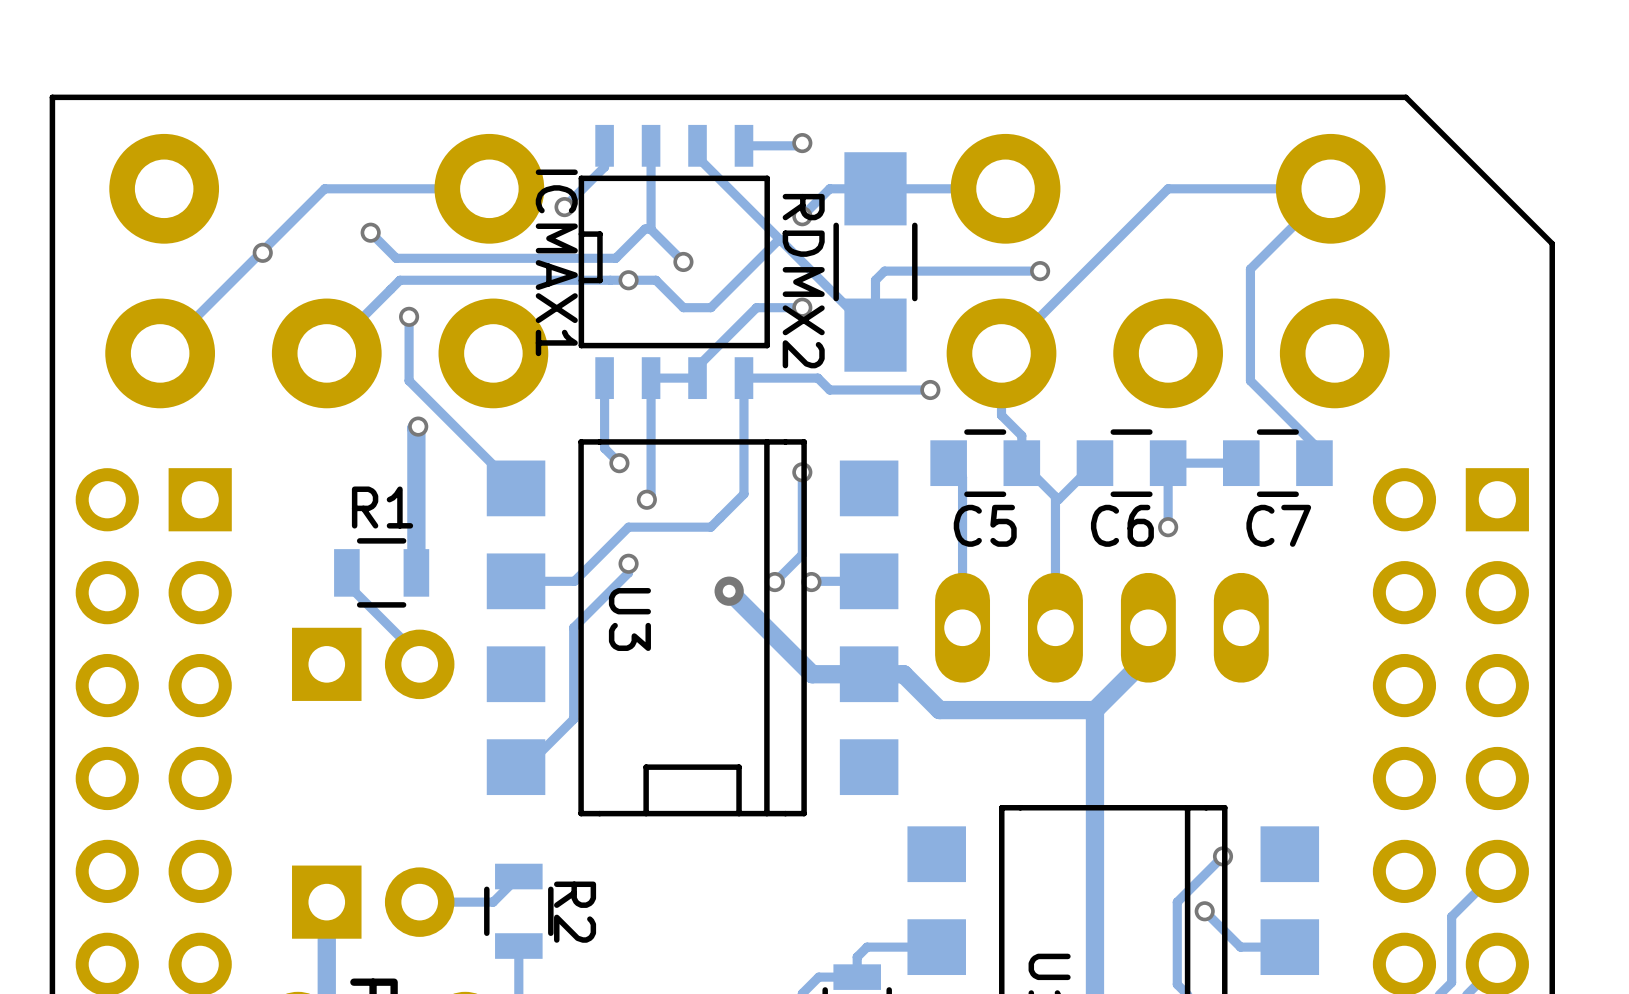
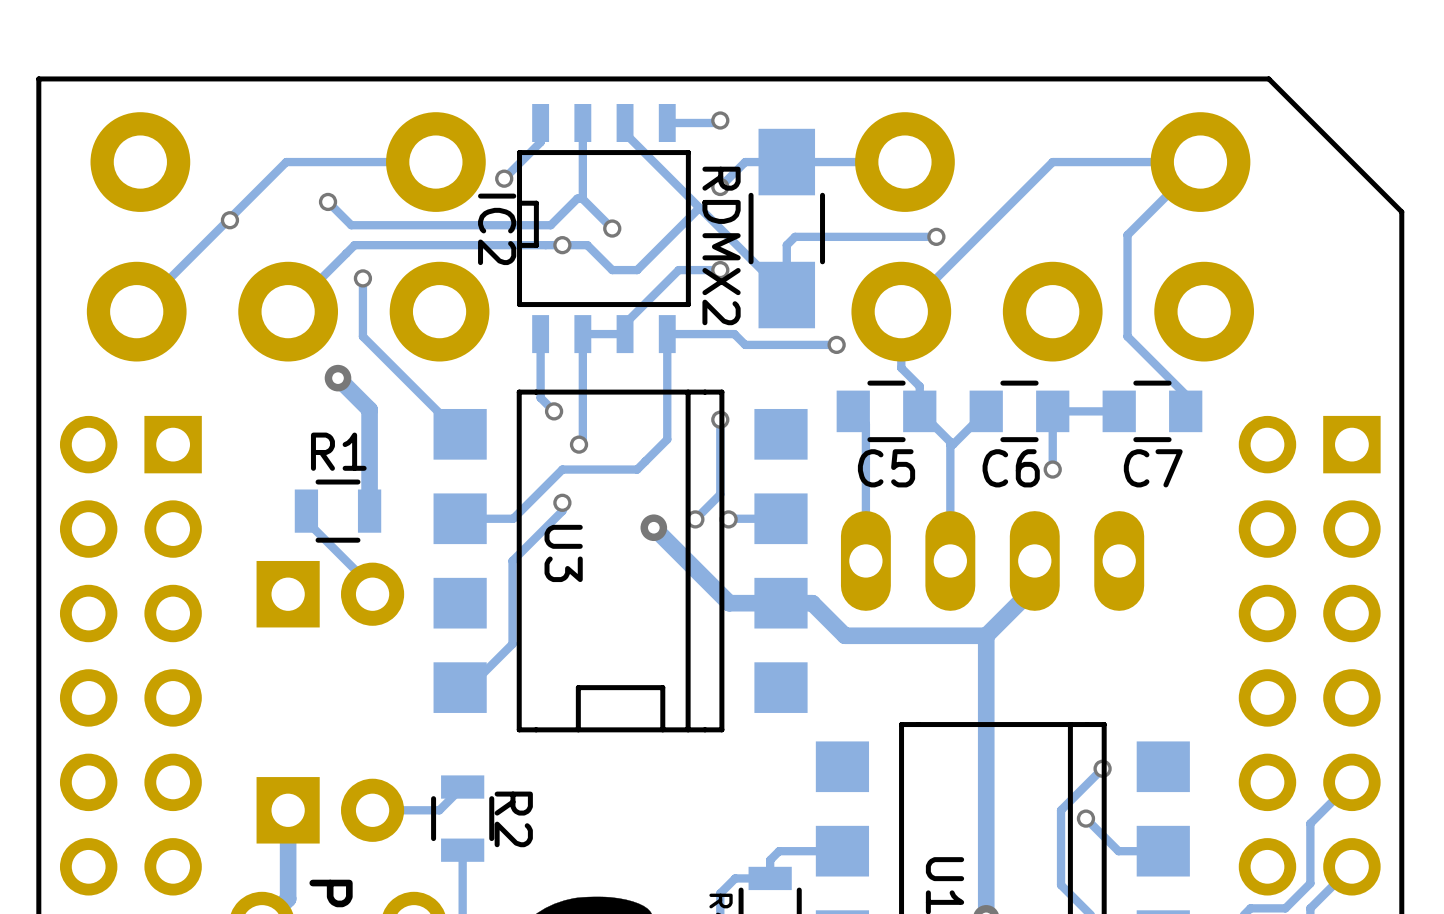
ICMAX1 name: ICMAX1 (556, 262) -> IC2 (497, 229)
via: none -> (338, 378)
track: (418, 426) (416, 428) (416, 461) -> (338, 378) (369, 409)
via: (418, 426) -> none

